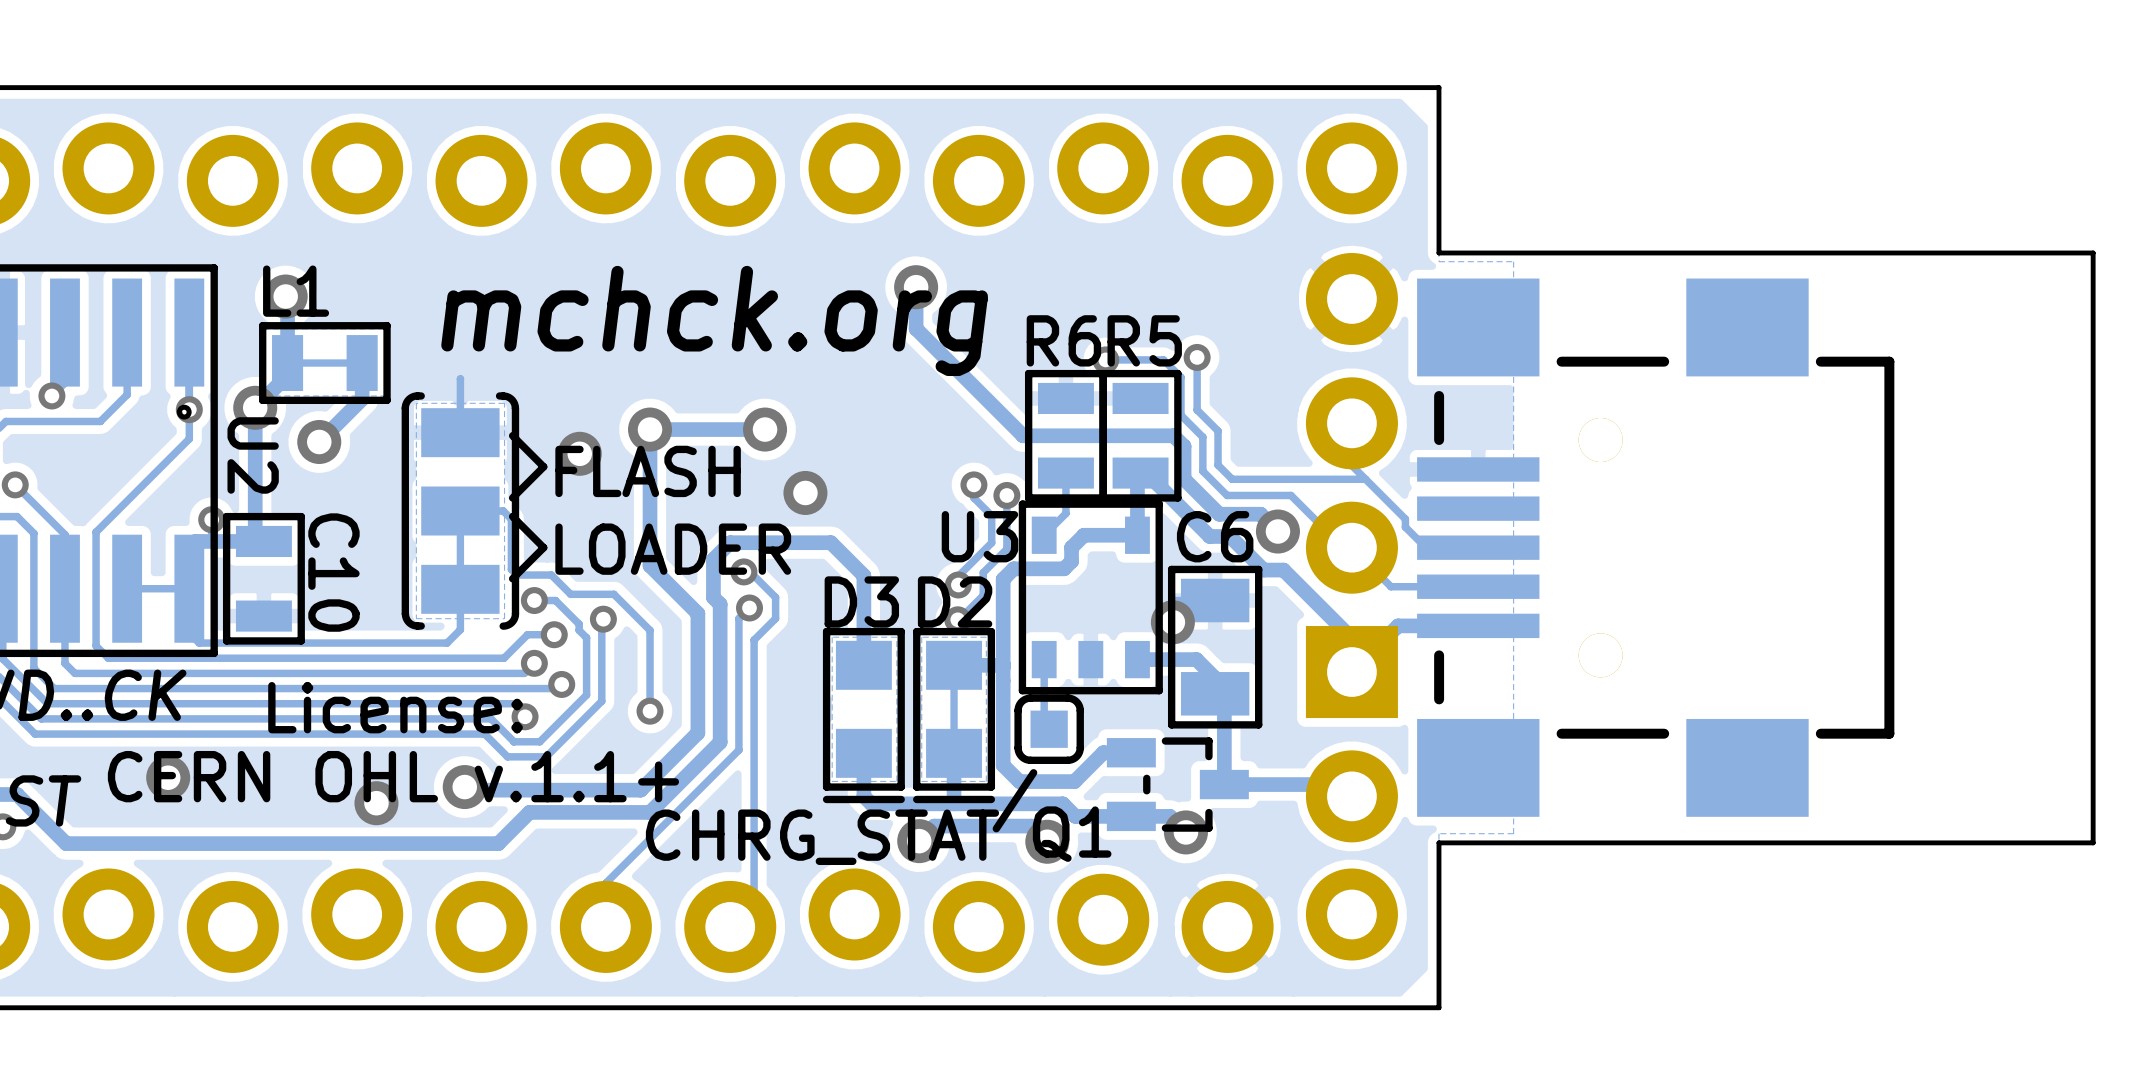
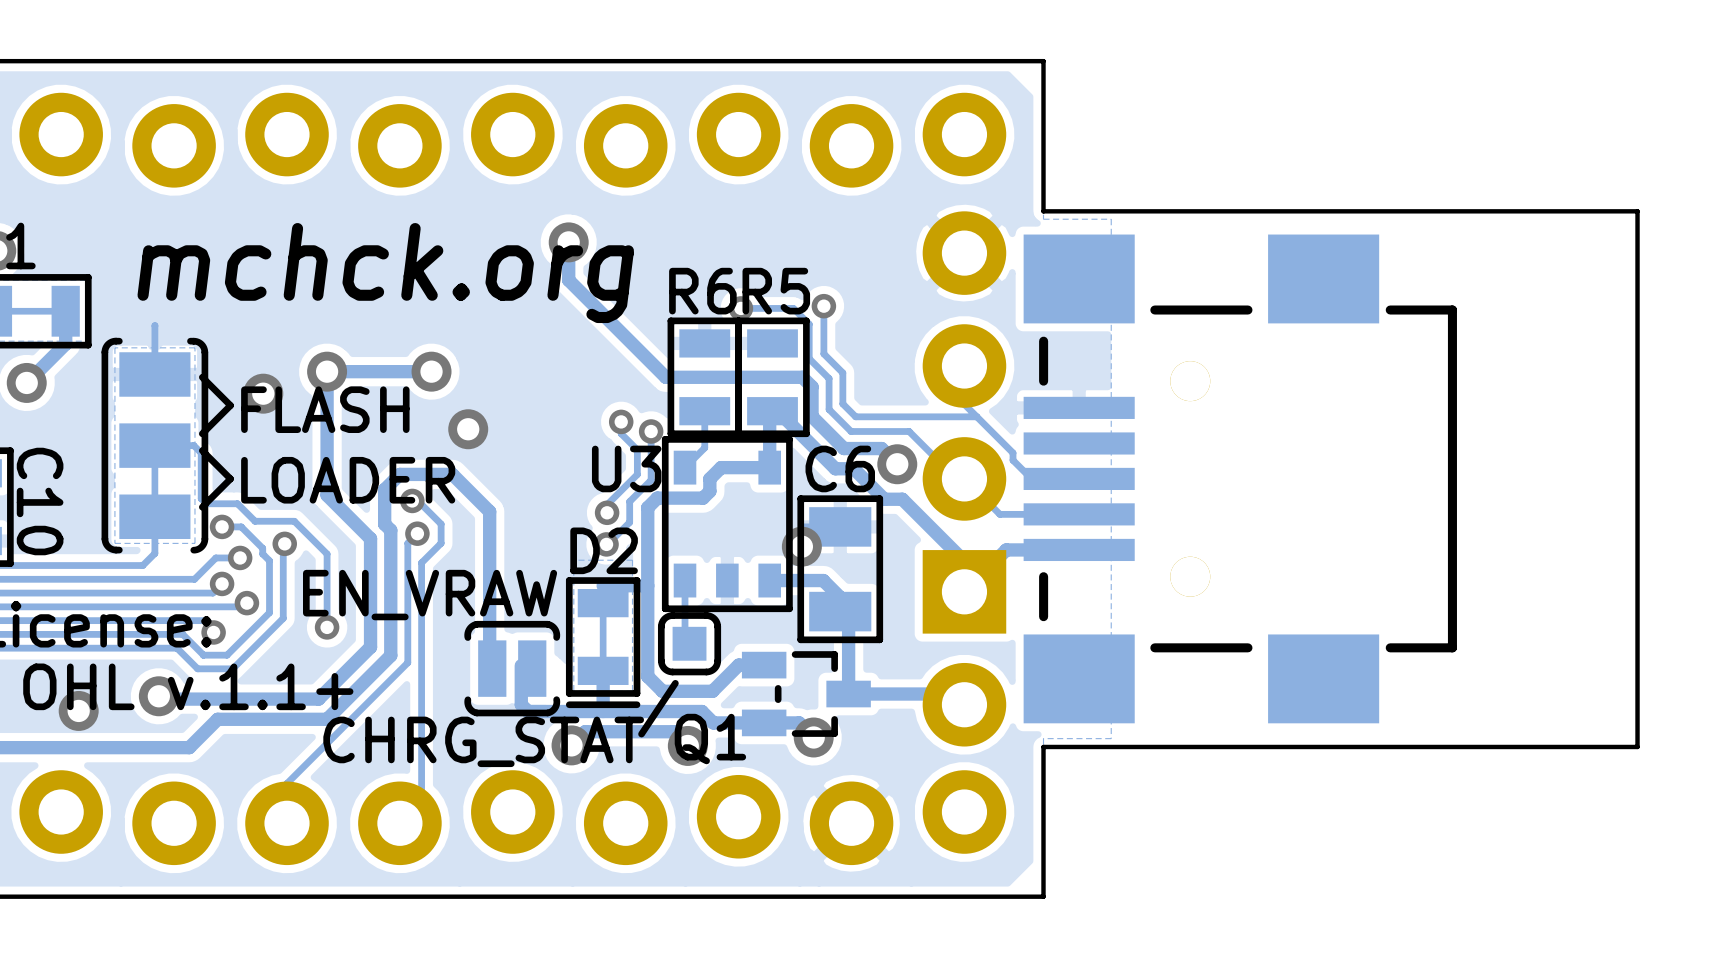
track: (788, 542) (830, 542) (863, 575) (863, 665) -> (452, 474) (489, 511) (489, 668) (492, 668)
D2 name position: D2 (955, 601) -> D2 (604, 550)
D2 footprint: [913, 627, 996, 804] -> [565, 577, 641, 709]
zone outline: (896, 637) (896, 781) (832, 781) (832, 637) (896, 637) -> none
D3: (863, 715) -> none
part: none -> EN_VRAW (512, 668)

